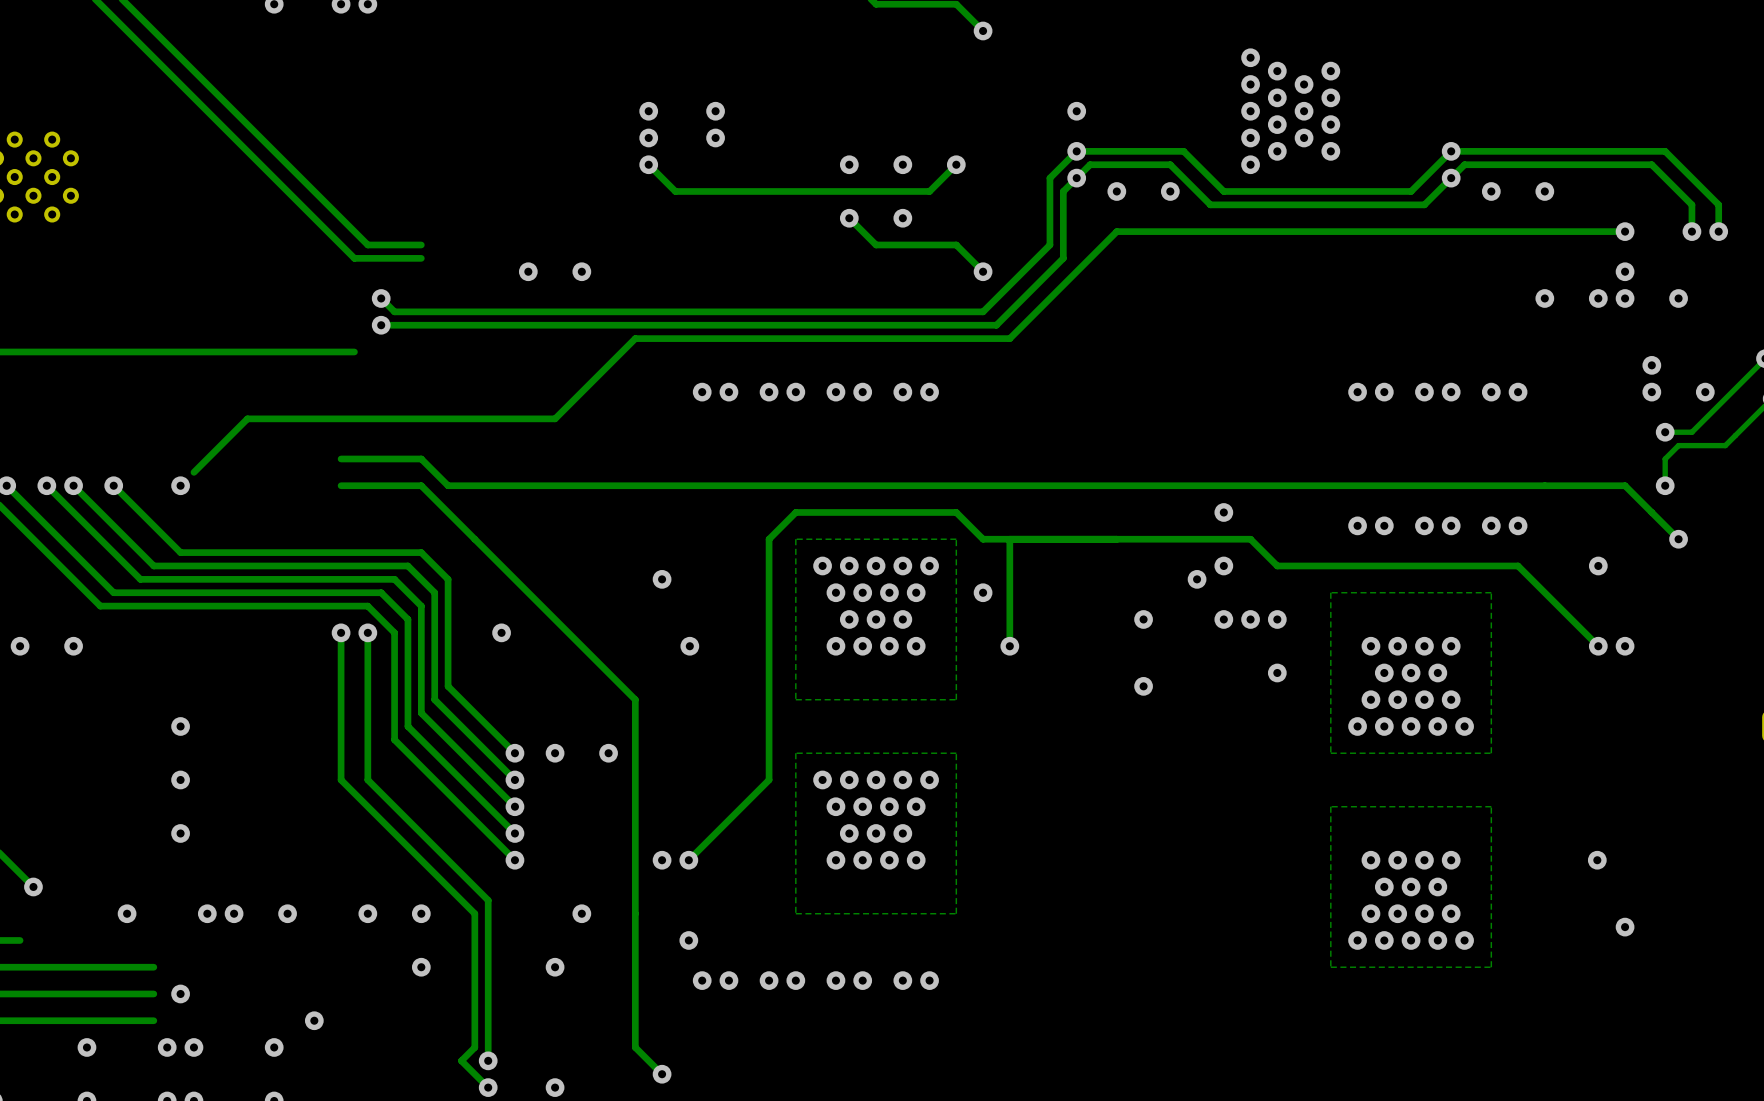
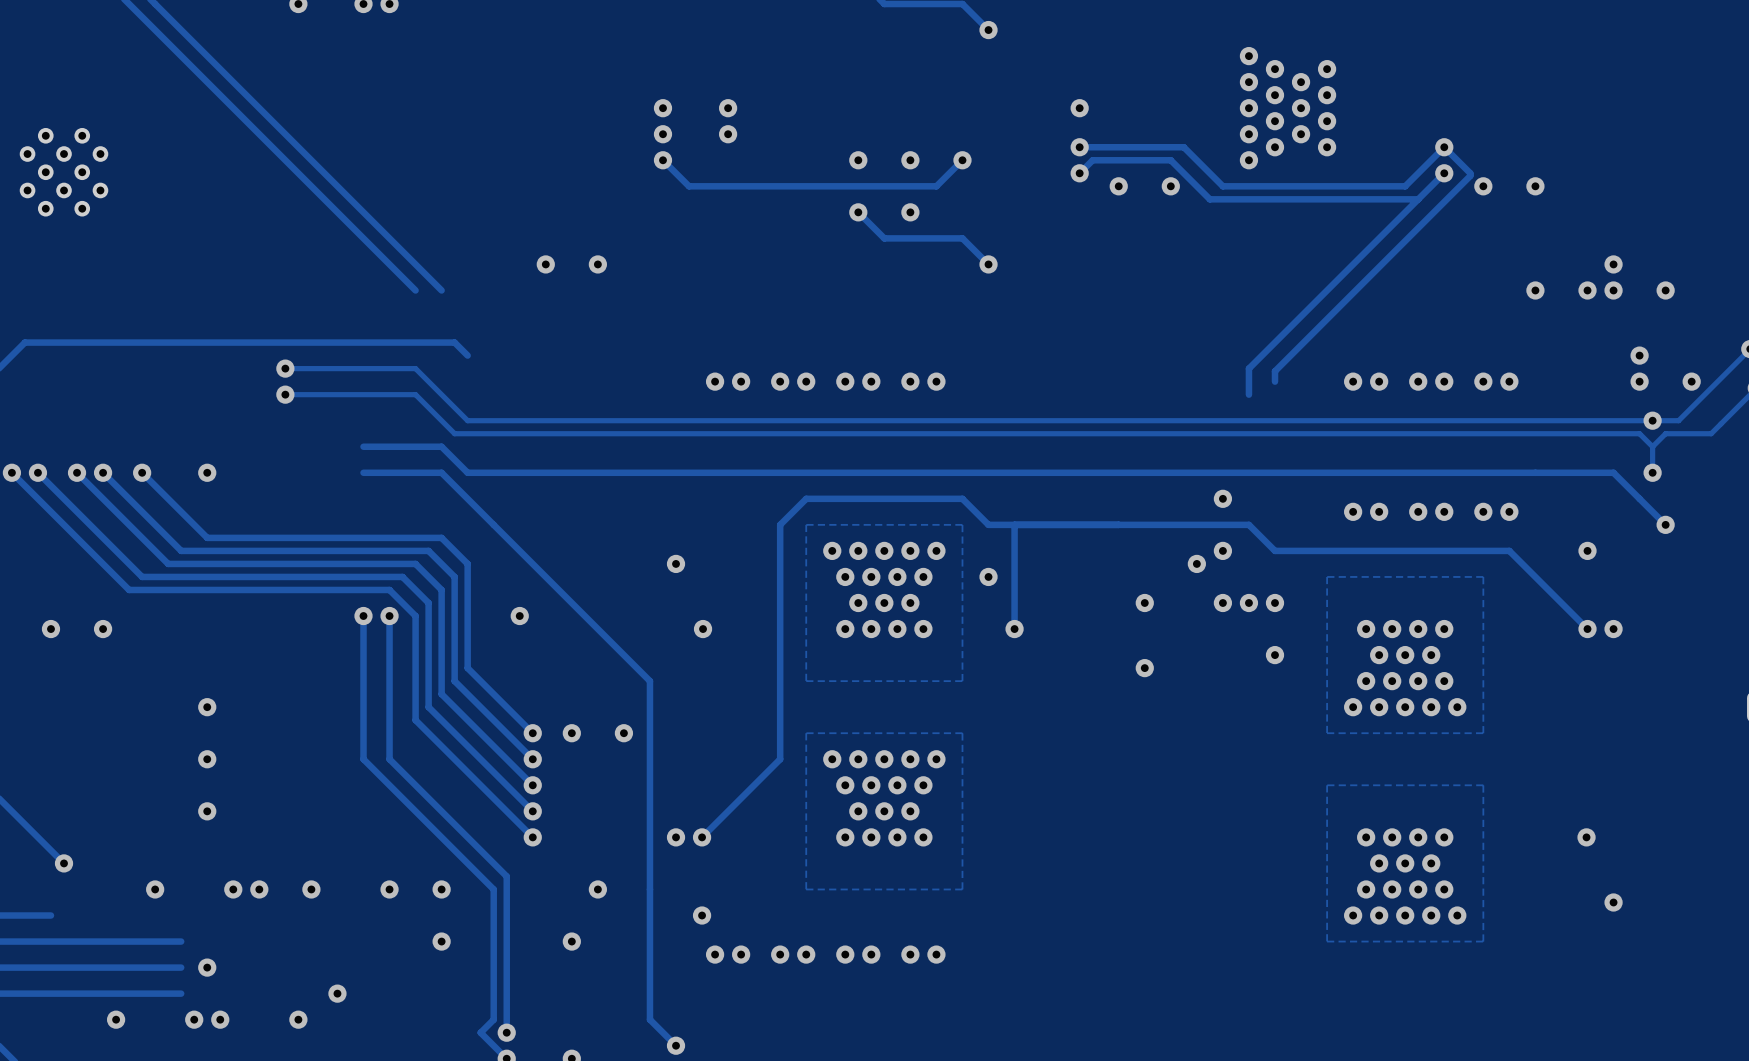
track: (1076, 151) (1049, 178) (1049, 244) (983, 311) (394, 311) (381, 298) -> none
track: (1451, 151) (1665, 151) (1718, 204) (1718, 231) -> (1444, 147) (1470, 173) (1470, 175) (1275, 371) (1275, 381)
track: (1076, 178) (1063, 191) (1063, 258) (996, 325) (381, 325) -> none
track: (1451, 178) (1464, 164) (1651, 164) (1691, 204) (1691, 231) -> none
track: none -> (1418, 199) (1248, 368) (1248, 394)
track: (1625, 231) (1116, 231) (1009, 338) (635, 338) (555, 418) (247, 418) (193, 472) -> none
via: (1625, 231) -> none
via: (1691, 231) -> none
via: (1718, 231) -> none
track: (421, 244) (367, 244) -> (441, 290) (389, 238)
track: (421, 258) (354, 258) -> (415, 290) (376, 251)
via: (381, 298) -> none
via: (381, 325) -> none
track: none -> (376, 342) (454, 342) (467, 355)
track: none -> (285, 368) (415, 368) (467, 420) (1652, 420)
via: none -> (285, 368)
track: none -> (285, 394) (415, 394) (454, 433) (1639, 433) (1652, 446)
via: none -> (285, 394)

